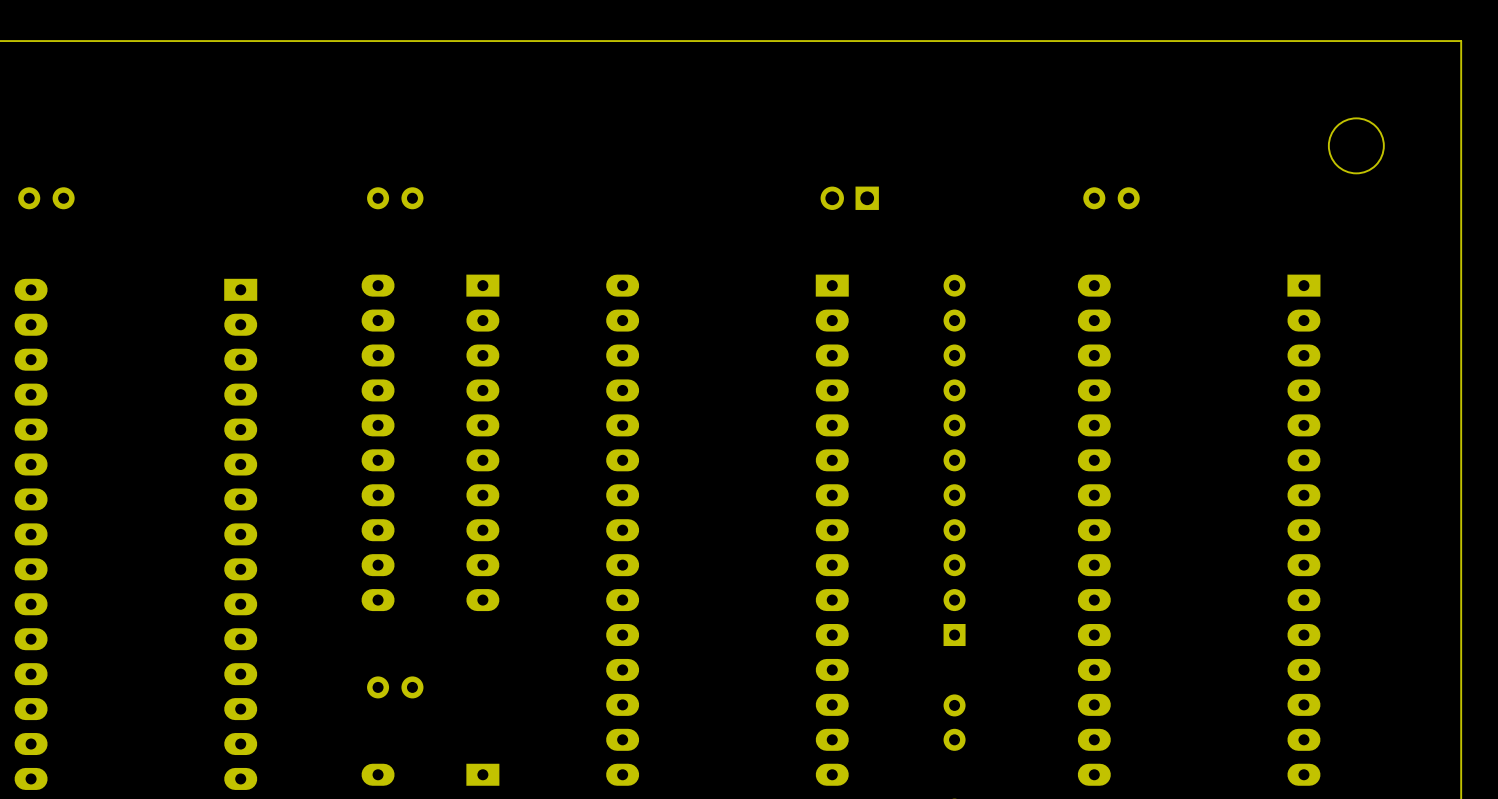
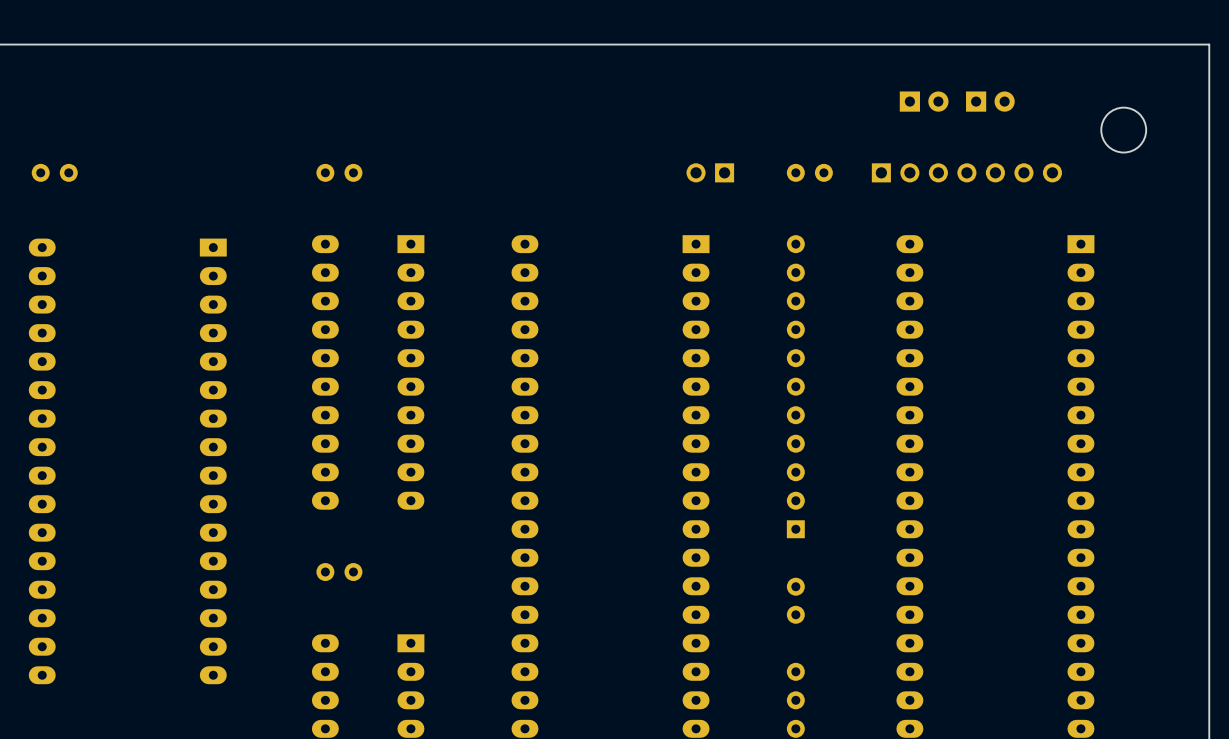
part: none -> (924, 101)
part: none -> (990, 101)
part position: (1111, 198) -> (809, 172)
part: none -> (966, 172)

